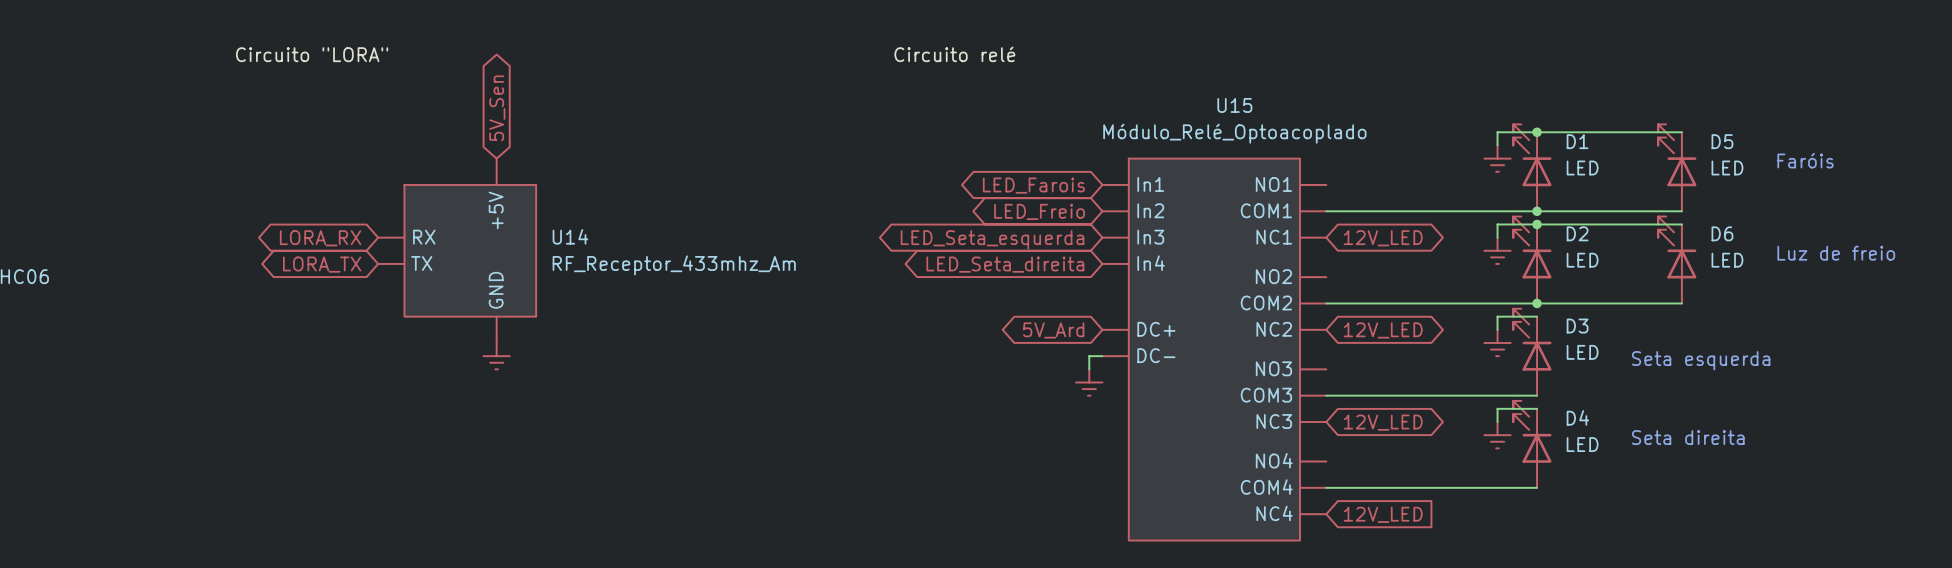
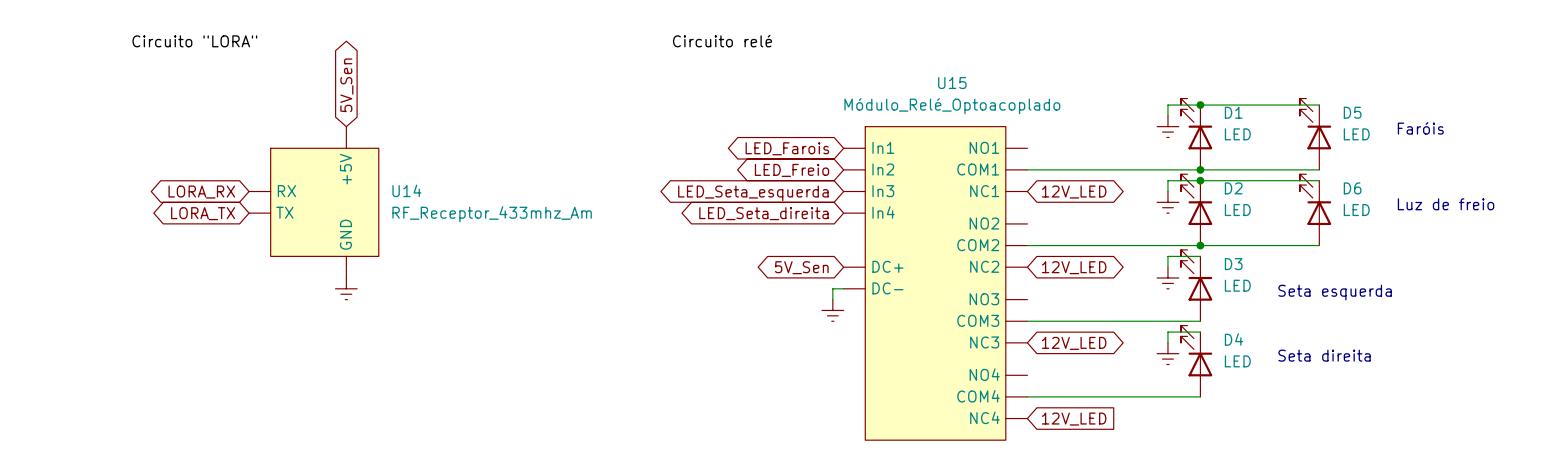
global label: 5V_Ard (1053, 330) -> 5V_Sen (801, 267)

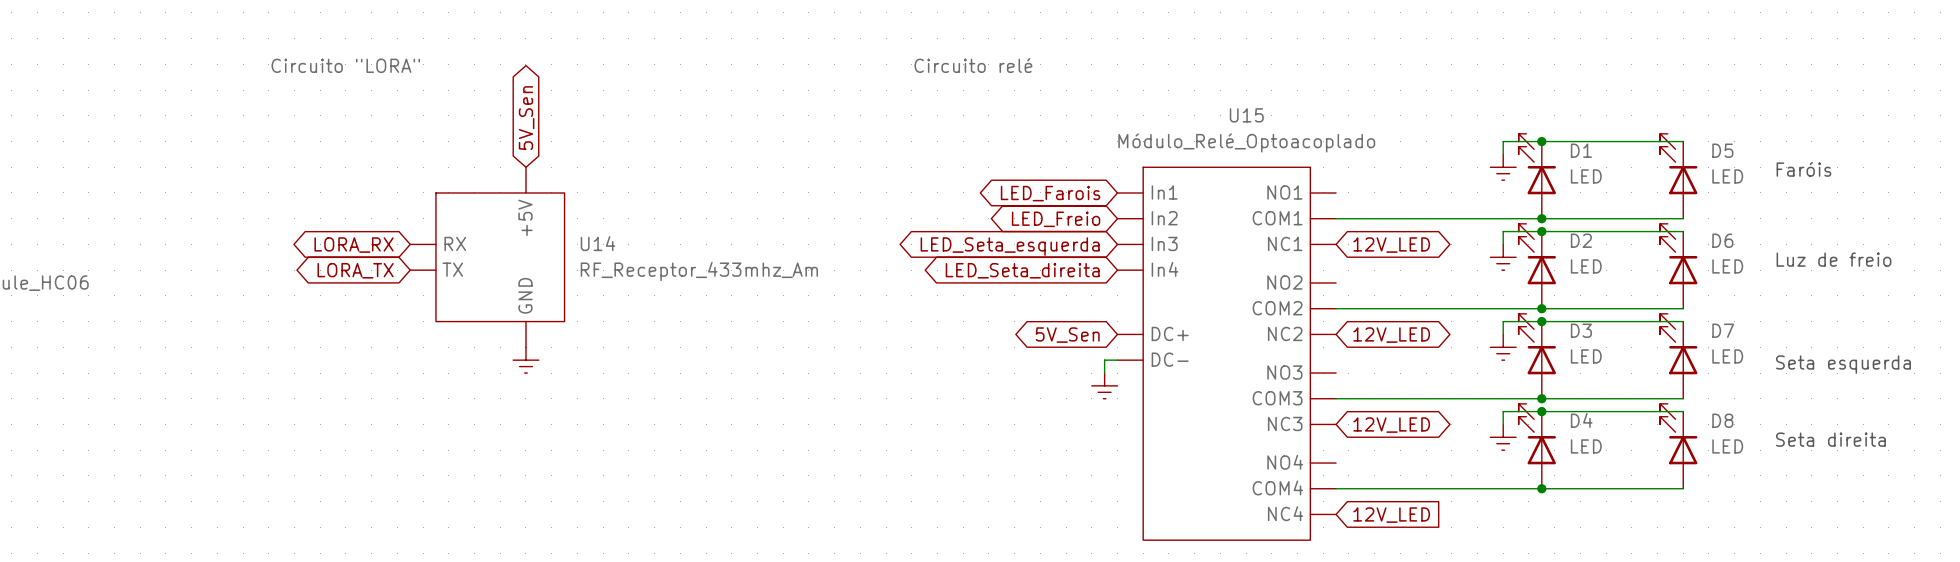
wire: none -> (1541, 321) (1683, 321)
junction: none -> (1541, 321)
D7: none -> LED (1678, 356)
text position: Seta esquerda (1335, 292) -> Seta esquerda (1843, 364)
wire: none -> (1541, 398) (1683, 398)
junction: none -> (1541, 398)
wire: none -> (1541, 411) (1683, 411)
junction: none -> (1541, 411)
text position: Seta direita (1324, 355) -> Seta direita (1830, 439)
D8: none -> LED (1678, 446)
wire: none -> (1541, 488) (1683, 488)
junction: none -> (1541, 488)

